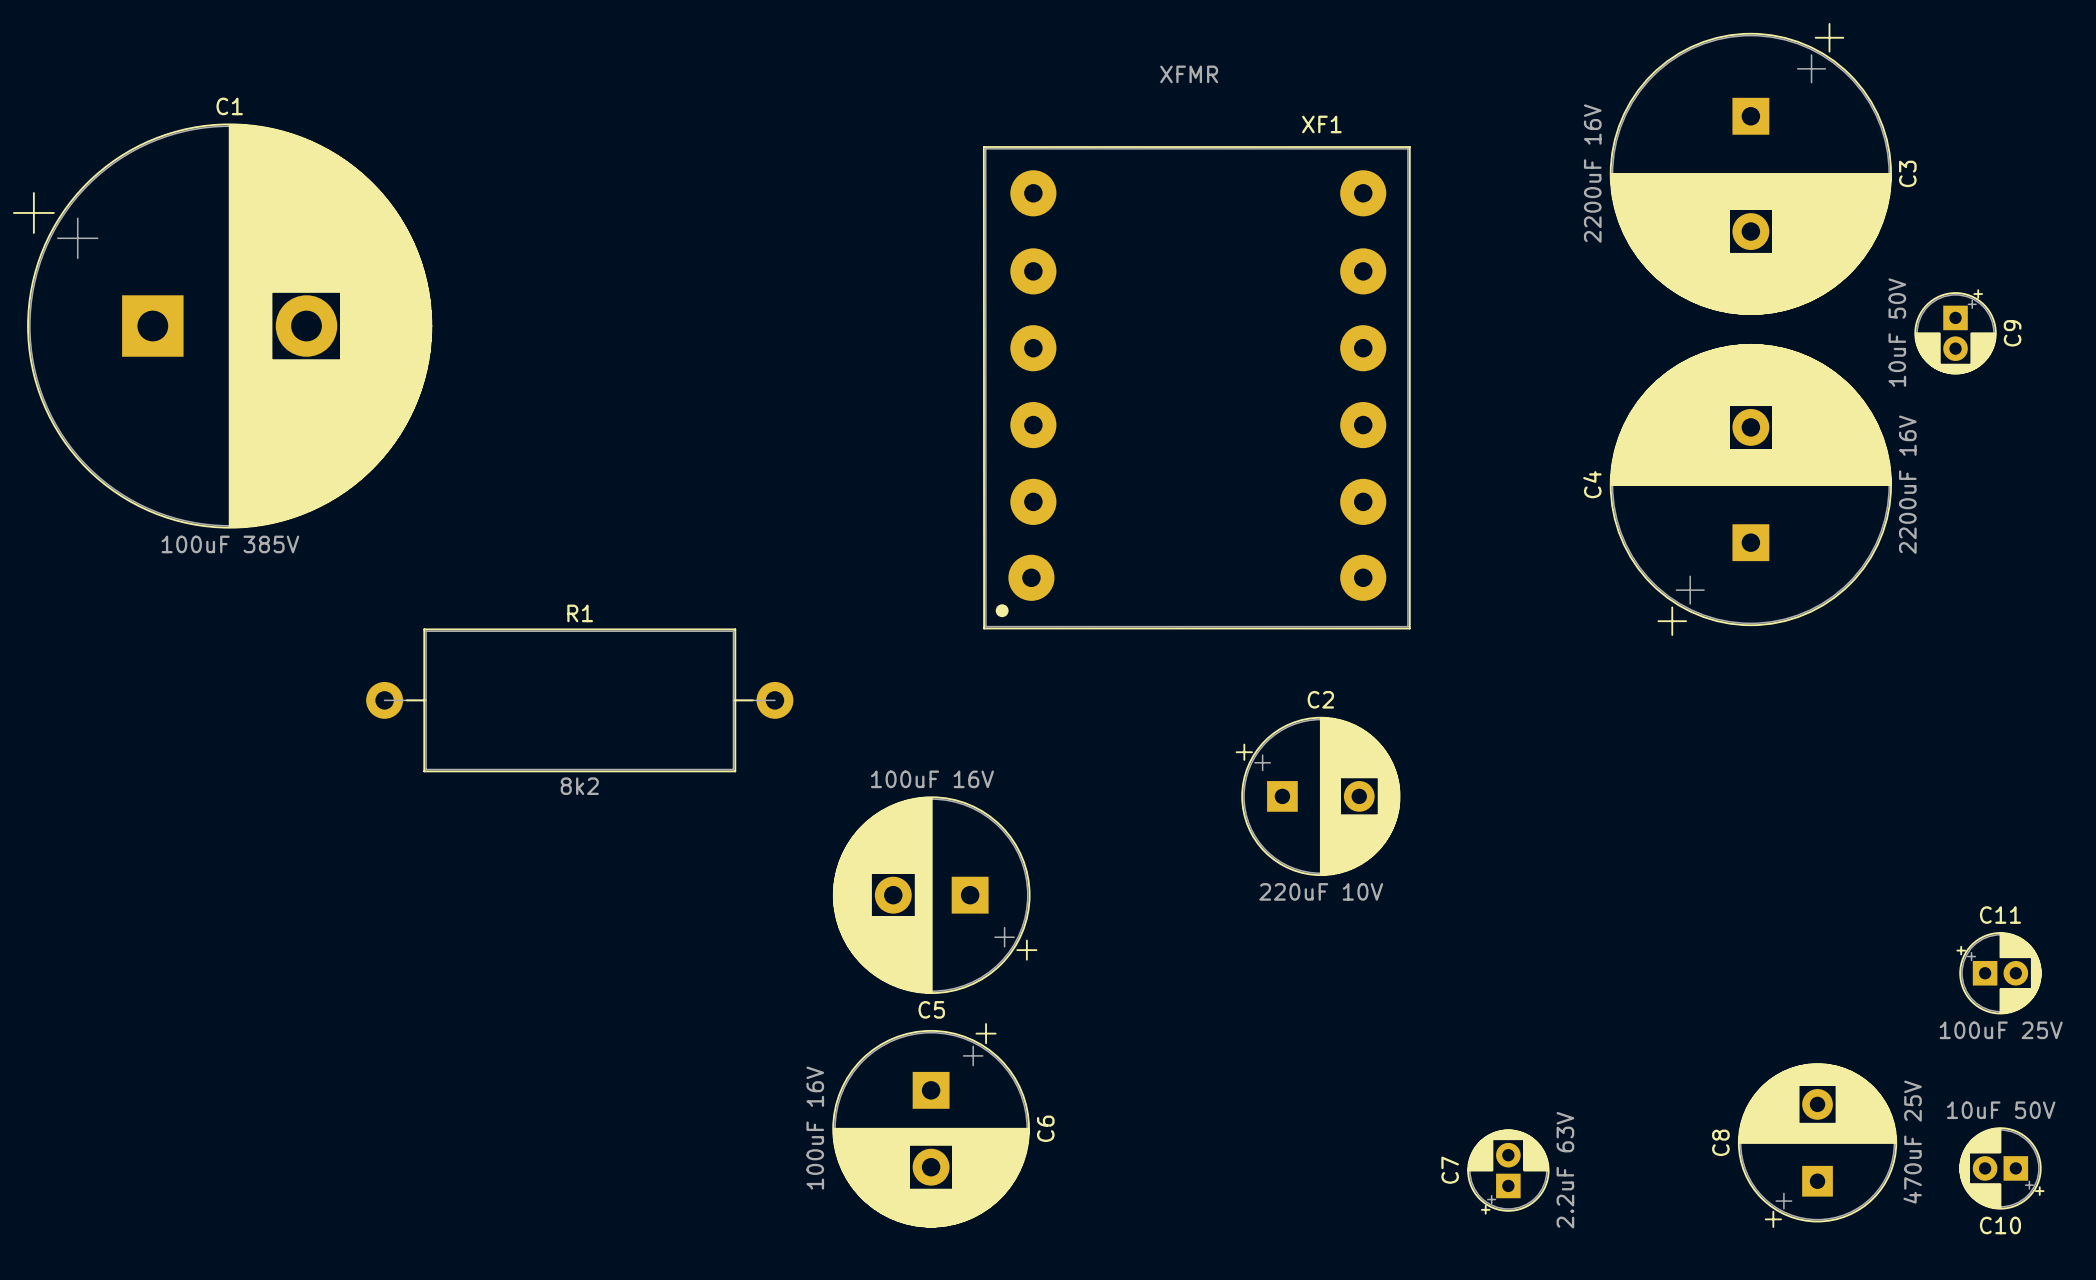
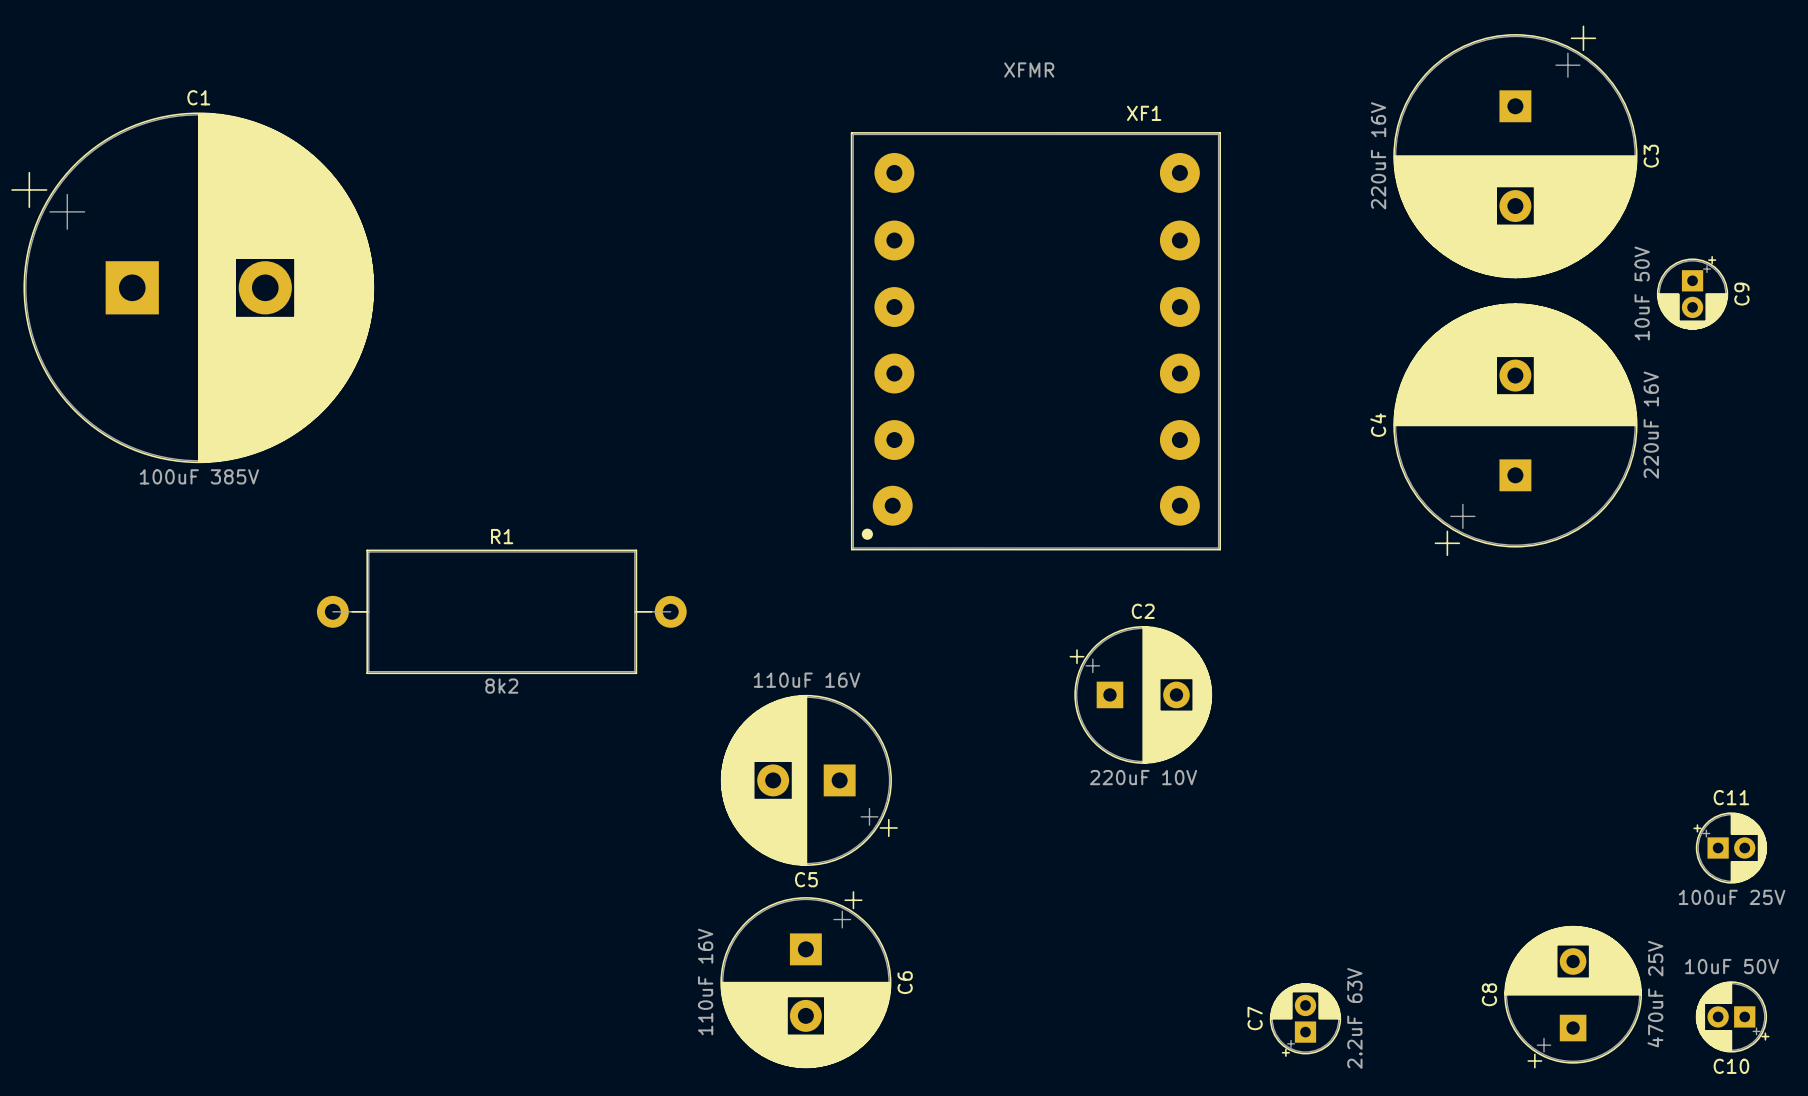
C3 value: 2200uF 16V (1592, 173) -> 220uF 16V (1378, 155)
C4 value: 2200uF 16V (1907, 484) -> 220uF 16V (1651, 425)
C5 value: 100uF 16V (932, 779) -> 110uF 16V (807, 680)
C6 value: 100uF 16V (815, 1128) -> 110uF 16V (705, 981)

